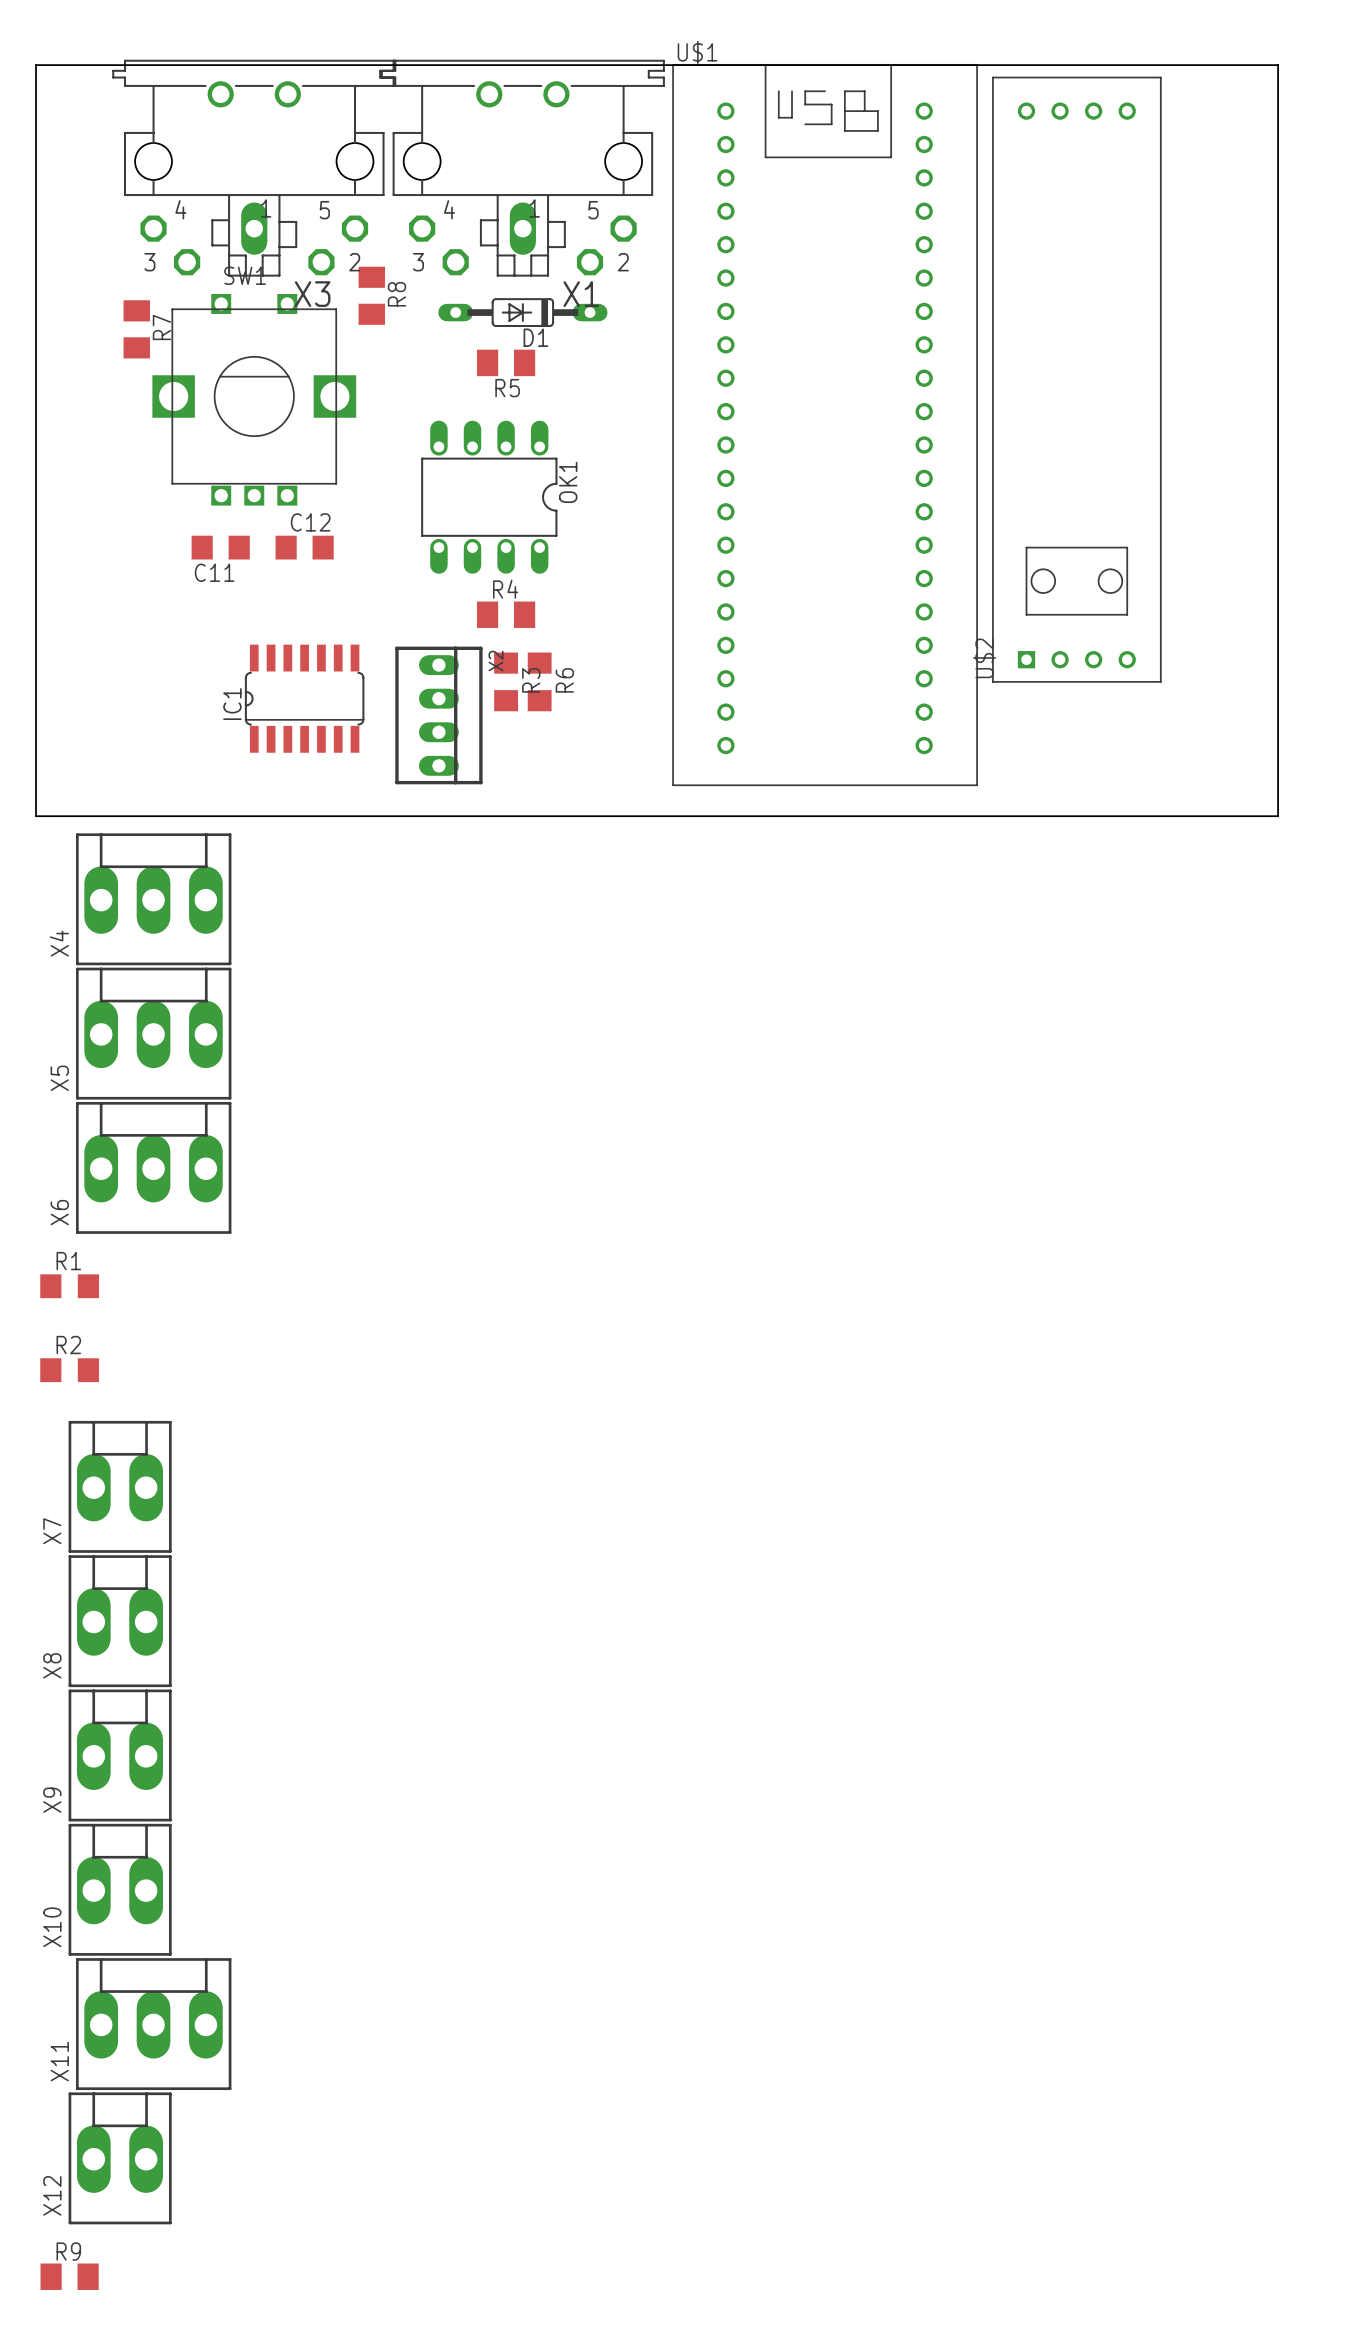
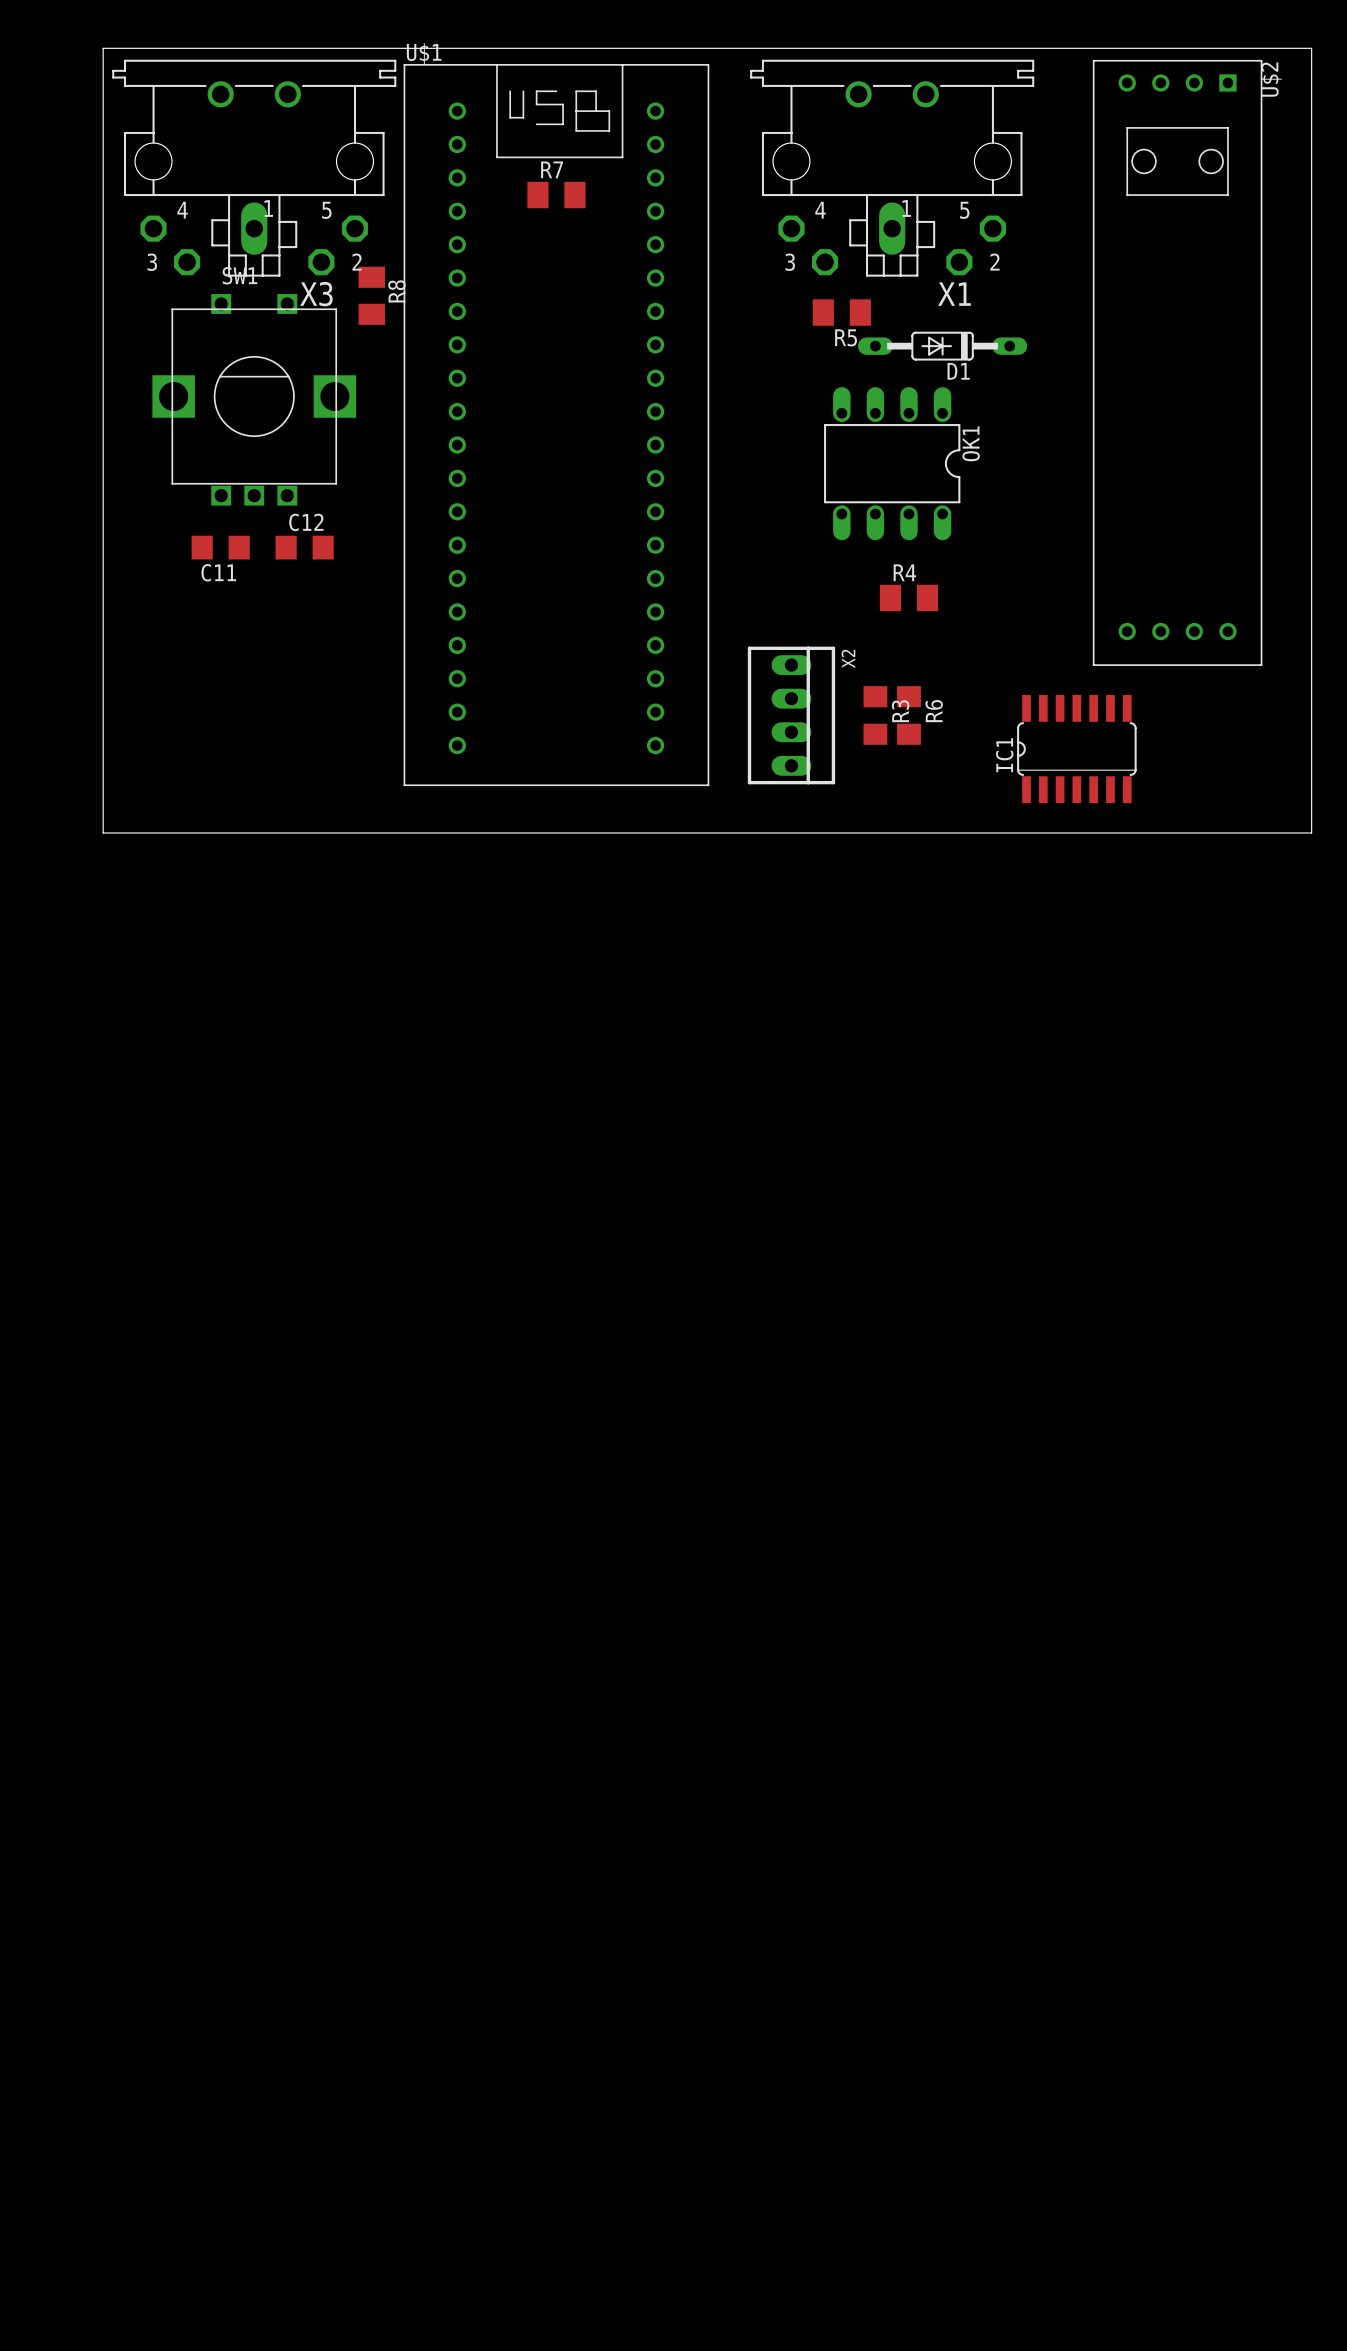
board edge: (36, 65) (1278, 65) (1278, 816) (36, 816) (36, 65) -> (103, 48) (103, 832) (1311, 832) (1311, 48) (103, 48)
X1 position: (522, 168) -> (892, 168)
D1 position: (522, 312) -> (942, 346)
R7 name position: R7 (161, 327) -> R7 (552, 169)
R7 rotation: 0° (136, 329) -> 90° clockwise (556, 195)
R7 position: (136, 329) -> (556, 195)
R5 position: (506, 362) -> (841, 312)
U$2 rotation: 0° (1076, 379) -> 180° (1177, 362)
U$1 position: (825, 425) -> (556, 425)
OK1 position: (489, 497) -> (892, 463)
R4 position: (506, 614) -> (908, 597)
R3 position: (506, 681) -> (875, 715)
R6 position: (539, 681) -> (908, 715)
IC1 position: (304, 698) -> (1076, 749)
X2 position: (438, 715) -> (791, 715)
X4: (153, 899) -> none
X5: (153, 1033) -> none
X6: (153, 1167) -> none
R1: (69, 1286) -> none
R2: (69, 1370) -> none
X7: (120, 1486) -> none
X8: (120, 1621) -> none
X9: (120, 1755) -> none
X10: (120, 1889) -> none
X11: (153, 2024) -> none
X12: (120, 2158) -> none
R9: (69, 2276) -> none

